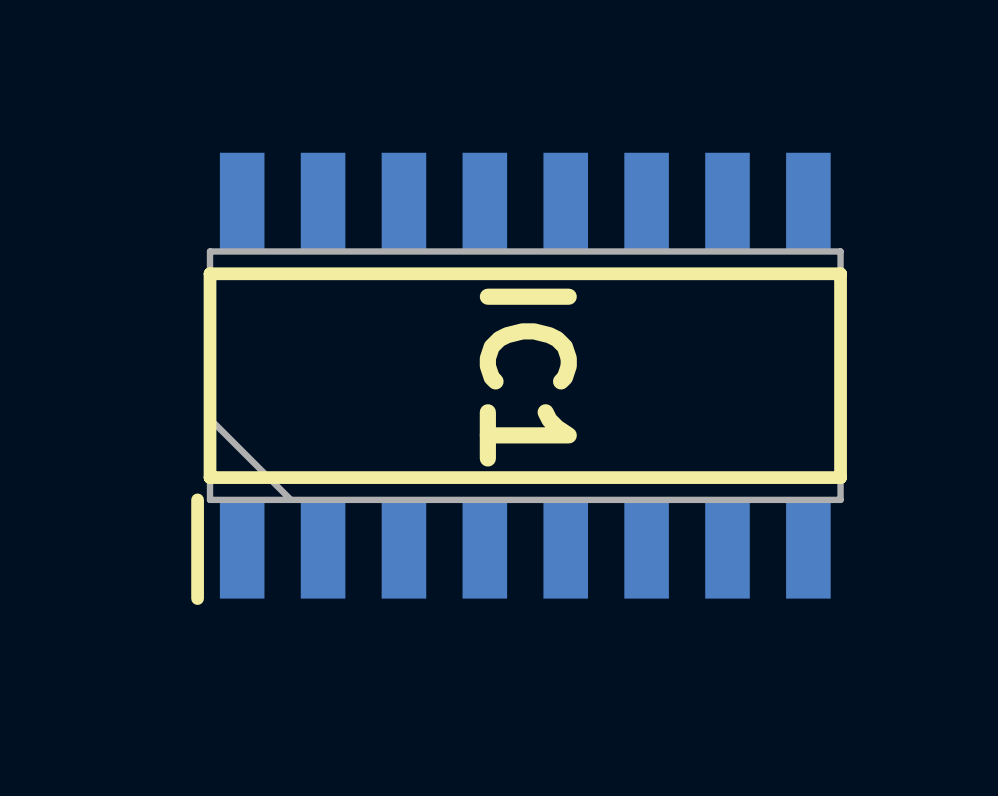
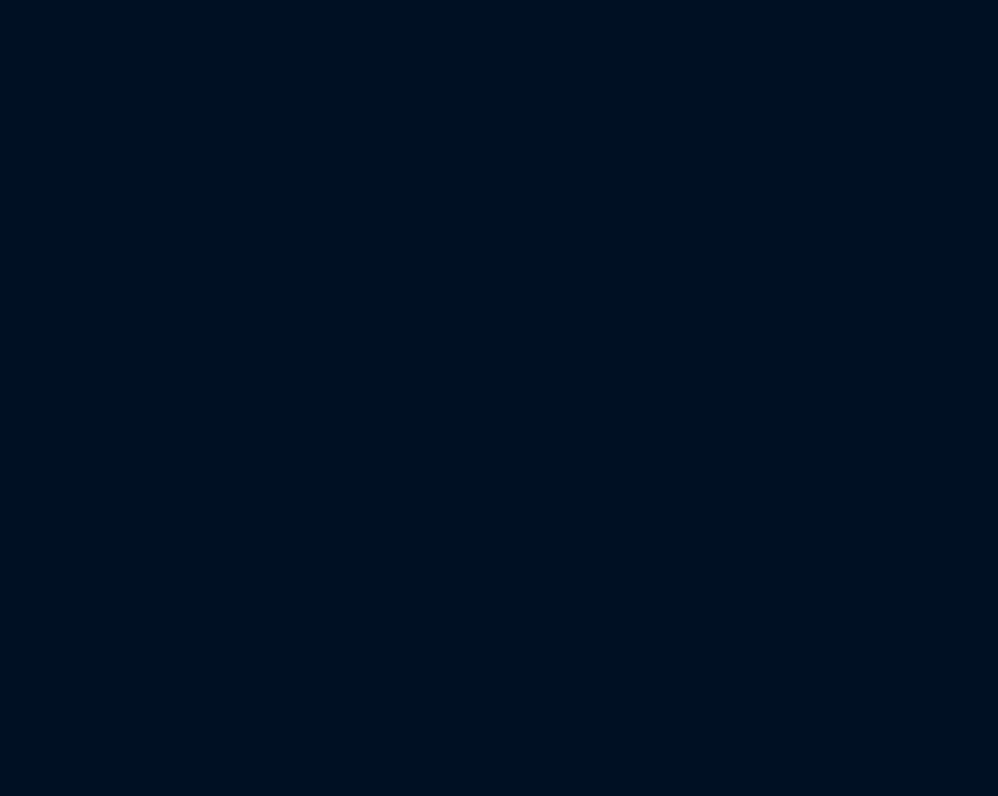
IC1: (519, 378) -> none

